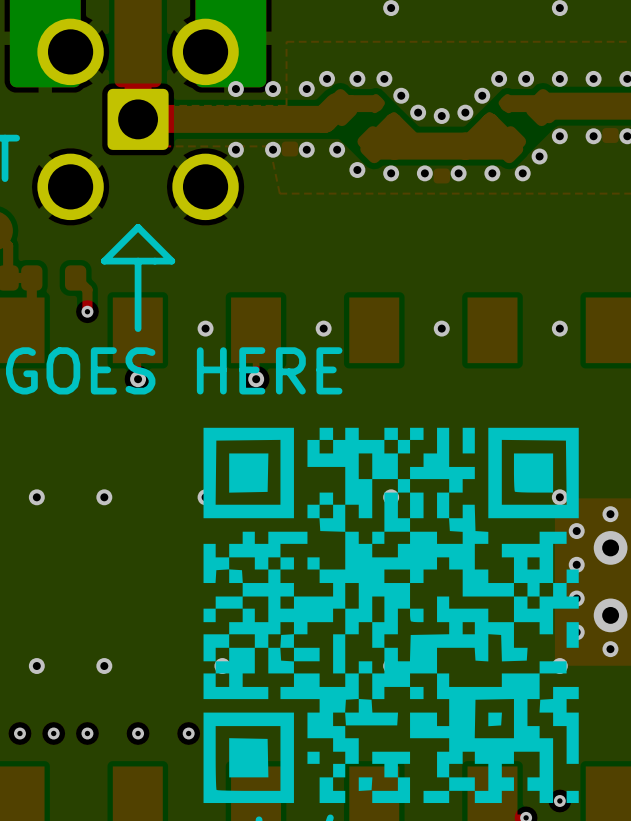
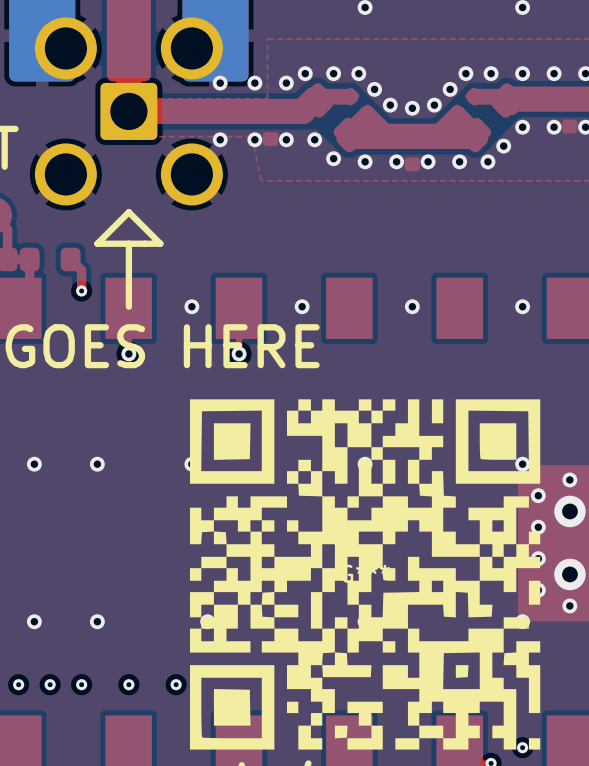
drawing: [203, 427, 579, 804] -> none
part: none -> (365, 574)

